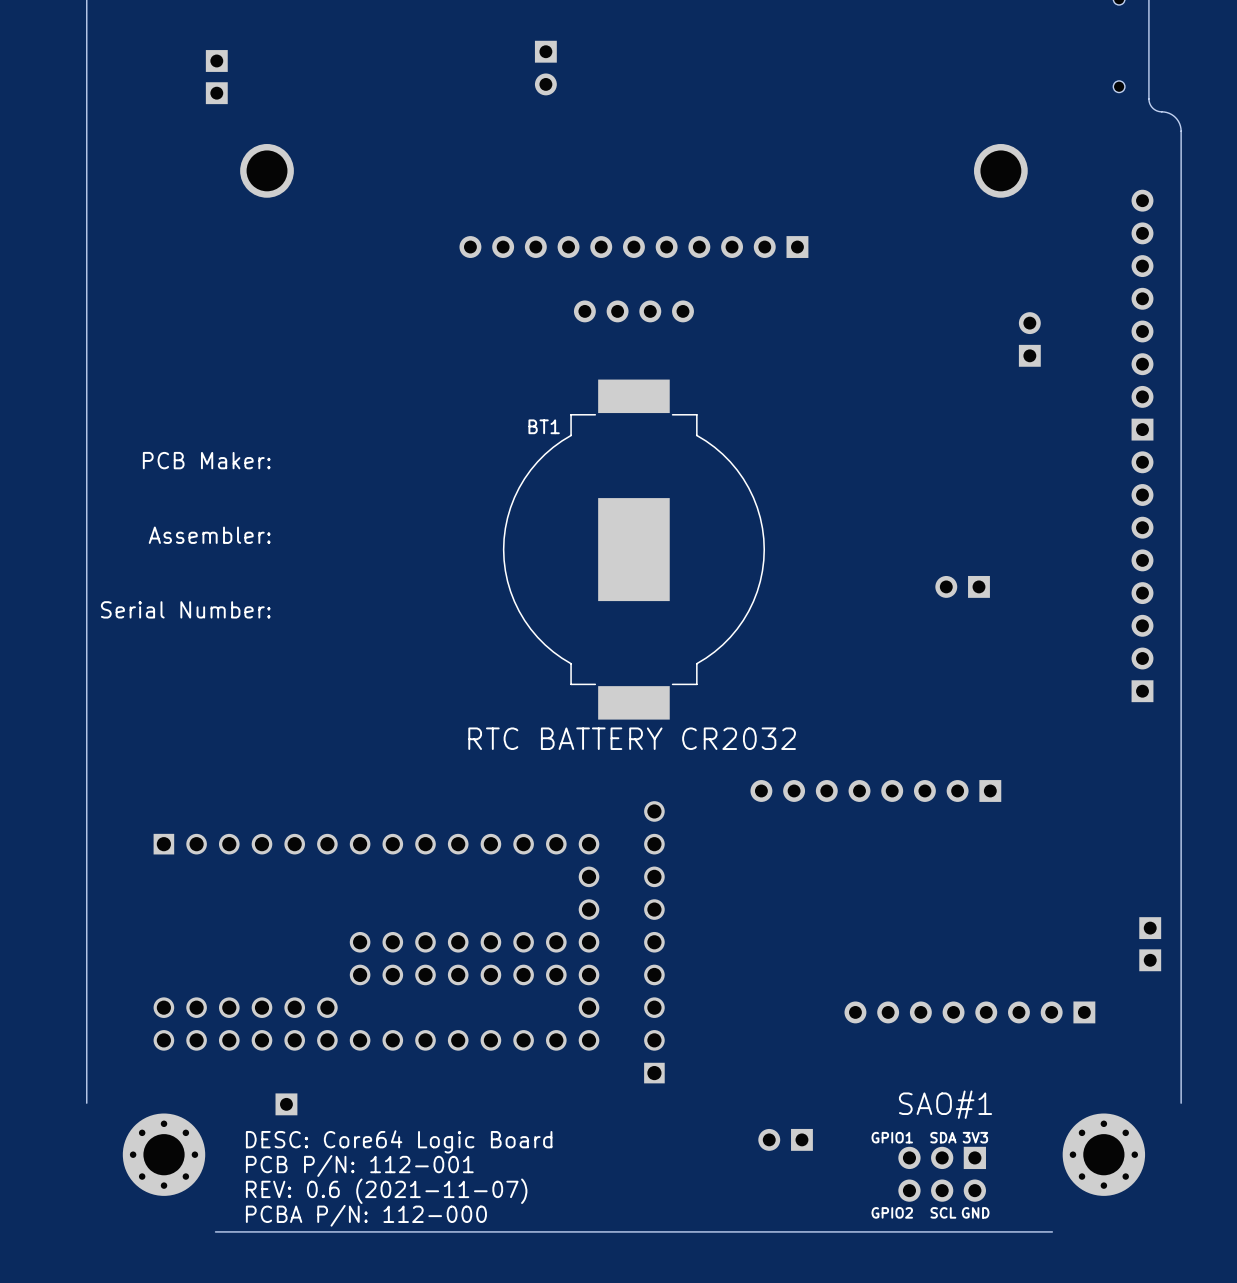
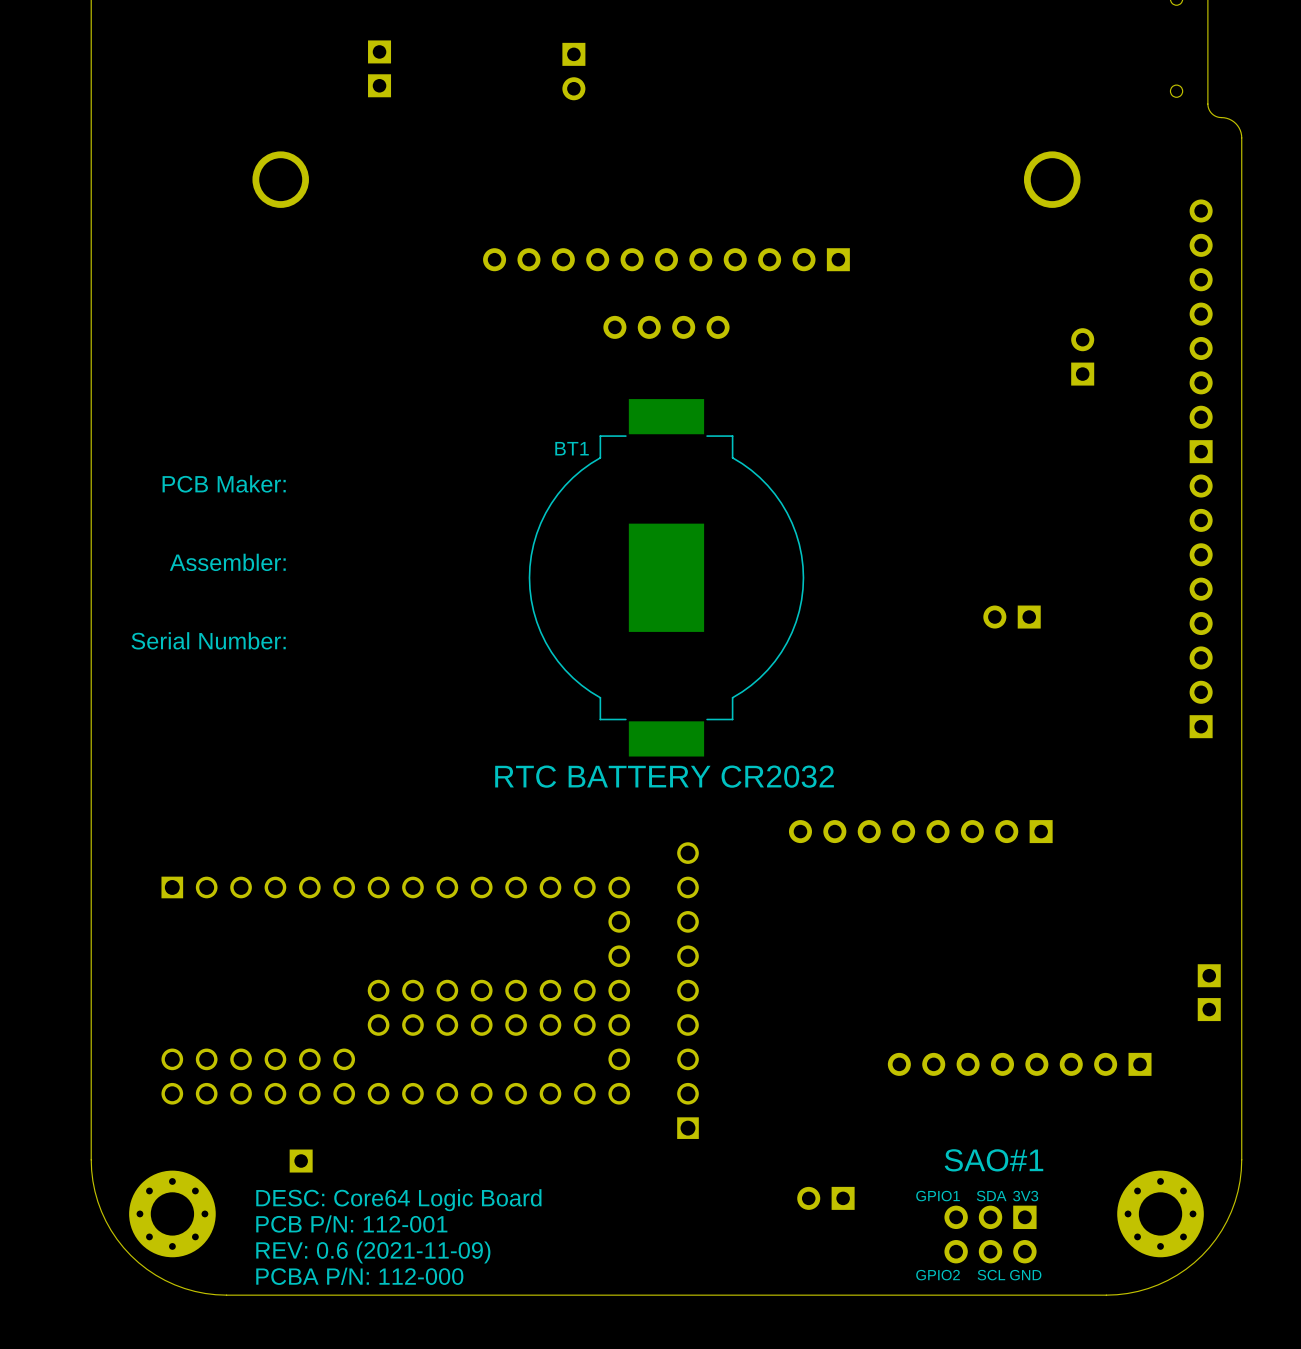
part: none -> (379, 51)
part: (216, 60) -> none
part: none -> (379, 85)
part: (216, 93) -> none
board edge: none -> (91, 1159) (94, 1191) (101, 1211) (111, 1230) (130, 1255) (147, 1269) (174, 1284) (205, 1293) (226, 1295)
board edge: none -> (1241, 1159) (1237, 1191) (1231, 1211) (1221, 1230) (1202, 1255) (1185, 1269) (1158, 1284) (1127, 1293) (1106, 1295)
text: REV: 0.6 (2021-11-07) (386, 1191) -> REV: 0.6 (2021-11-09) (373, 1252)

